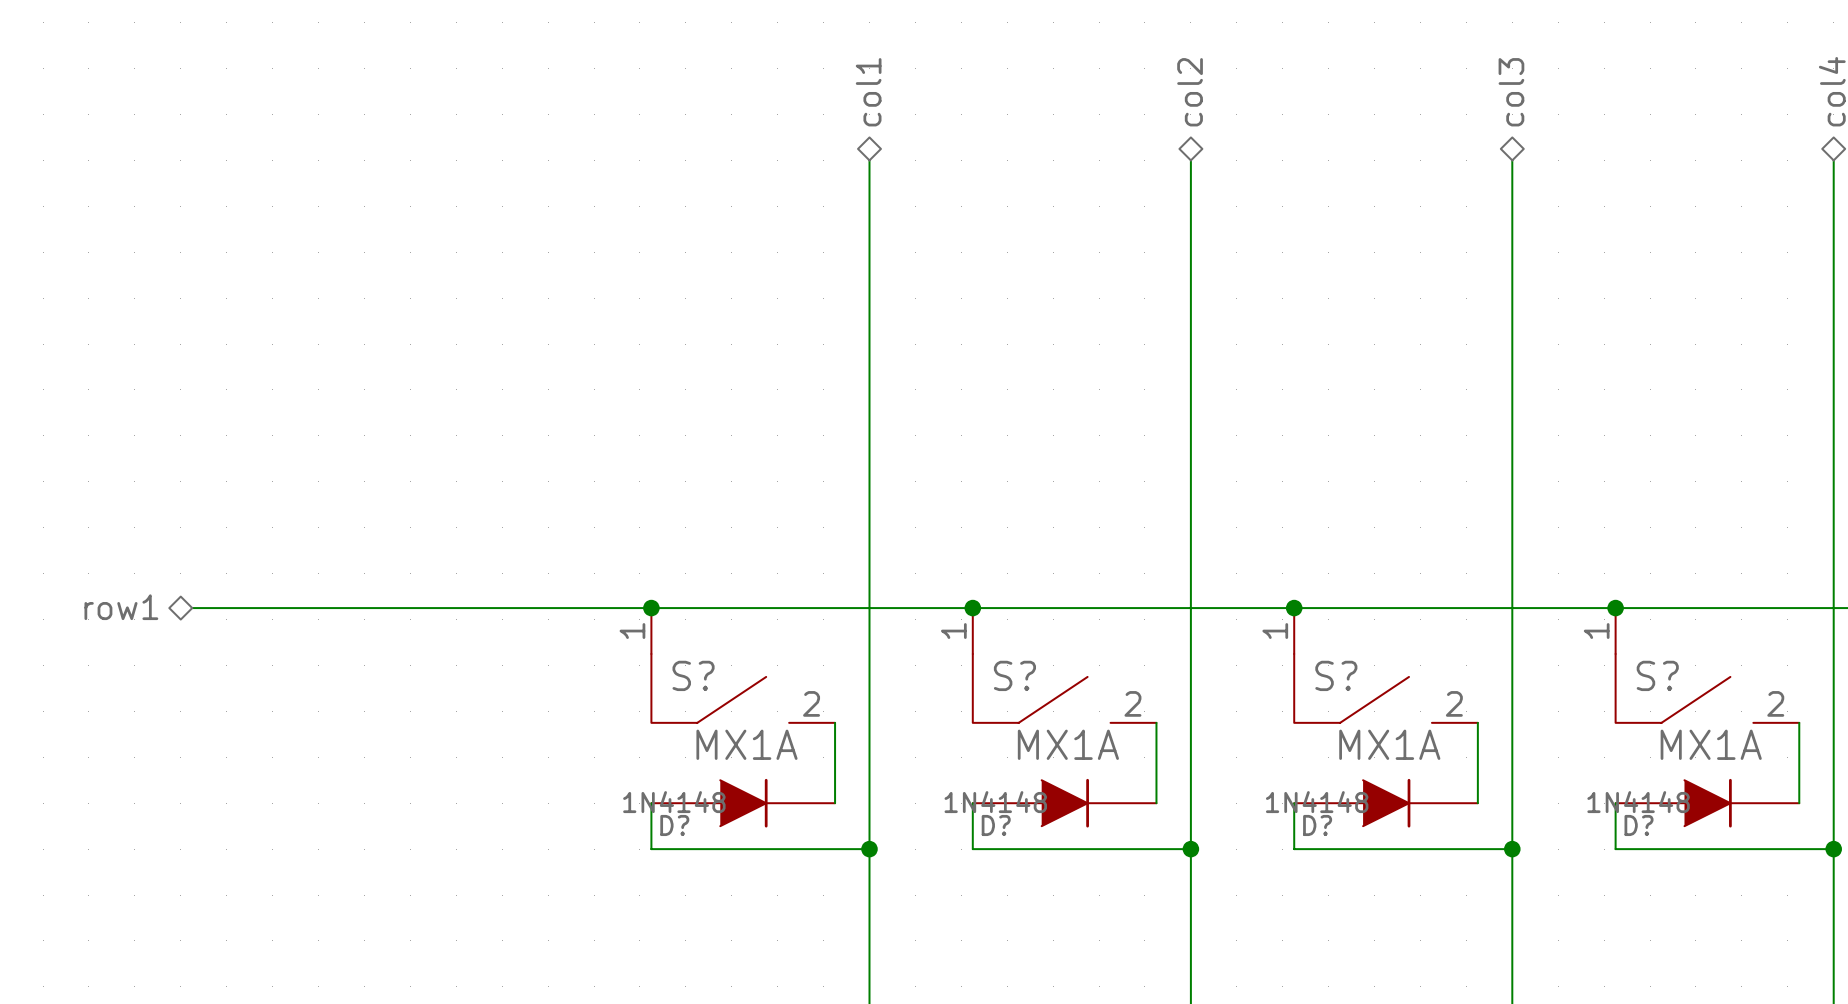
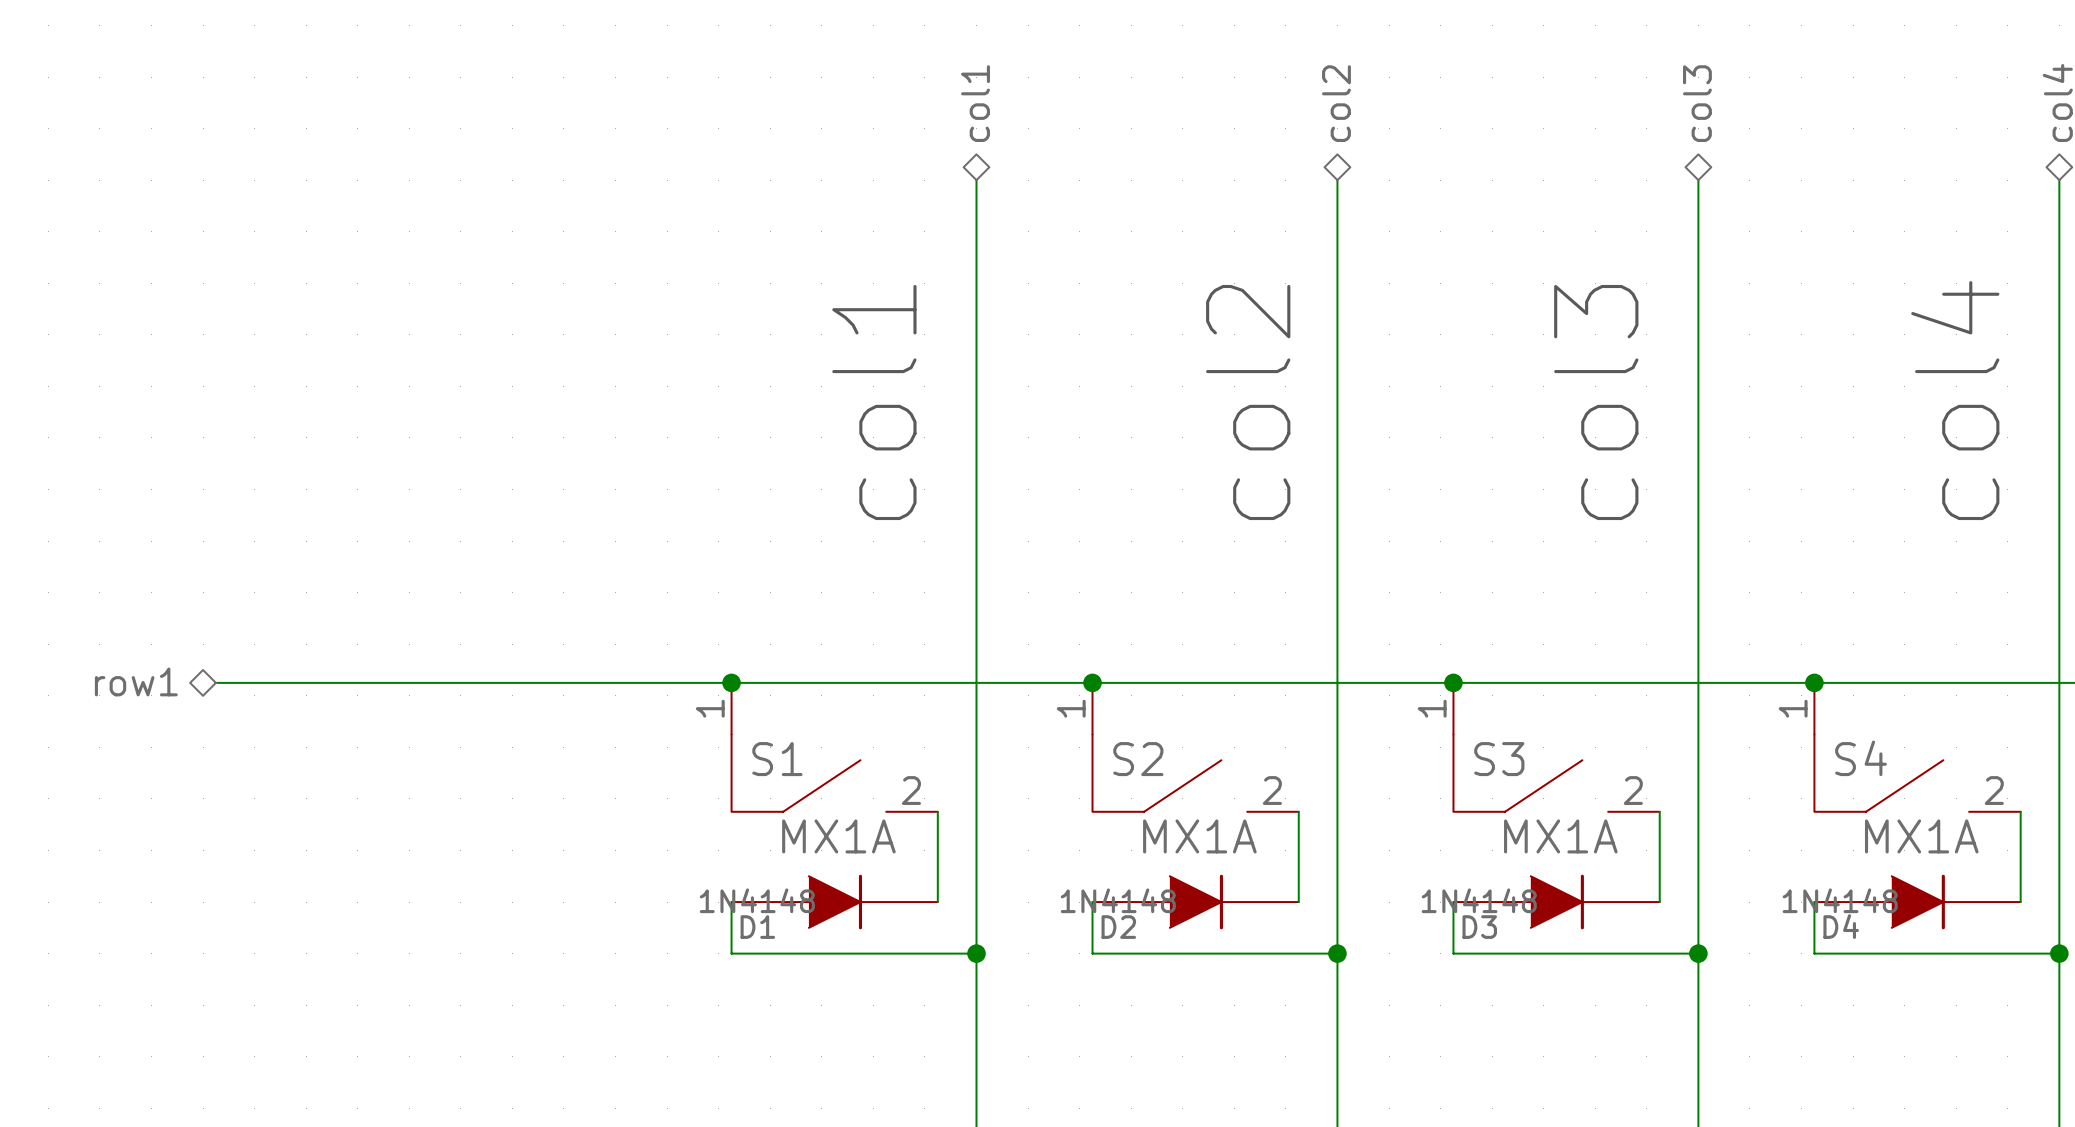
text: none -> col4 (1955, 400)
text: none -> col1 (874, 402)
text: none -> col2 (1248, 402)
text: none -> col3 (1596, 402)
S? name: S? (693, 675) -> S1 (777, 759)
S? name: S? (1014, 675) -> S2 (1138, 759)
S? name: S? (1336, 675) -> S3 (1499, 759)
S? name: S? (1657, 675) -> S4 (1861, 758)
D? name: D? (674, 825) -> D1 (757, 927)
D? name: D? (996, 825) -> D2 (1118, 927)
D? name: D? (1317, 825) -> D3 (1479, 927)
D? name: D? (1639, 825) -> D4 (1841, 926)

